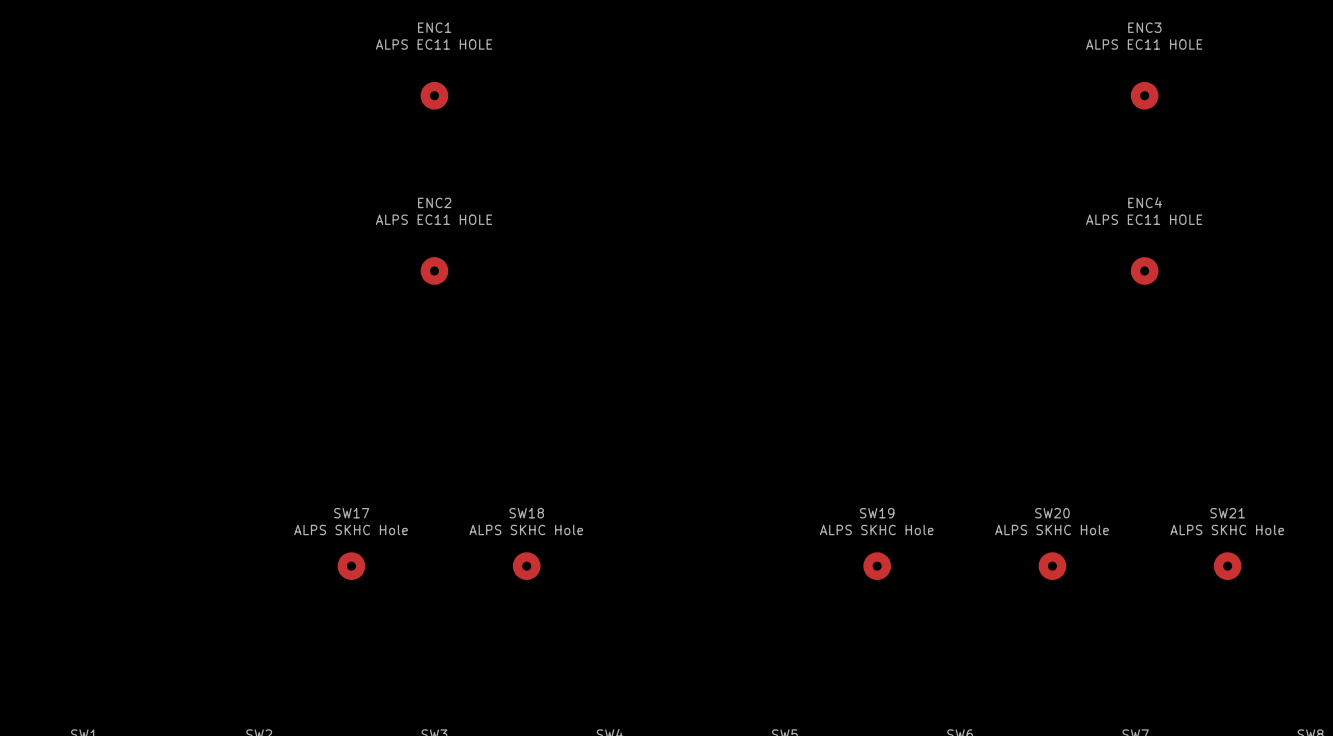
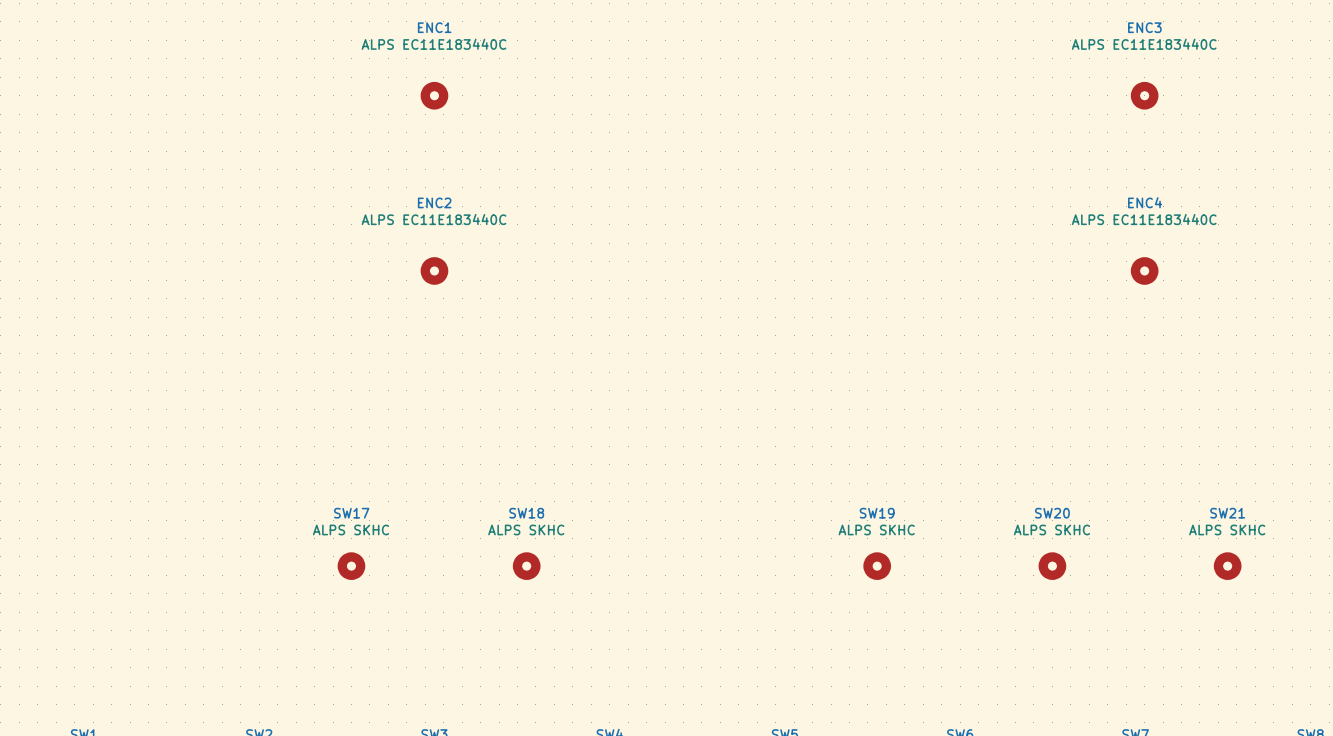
ENC1 value: ALPS EC11 HOLE (434, 44) -> ALPS EC11E183440C (434, 44)
ENC3 value: ALPS EC11 HOLE (1144, 44) -> ALPS EC11E183440C (1144, 44)
ENC2 value: ALPS EC11 HOLE (434, 219) -> ALPS EC11E183440C (434, 219)
ENC4 value: ALPS EC11 HOLE (1144, 219) -> ALPS EC11E183440C (1144, 219)
SW17 value: ALPS SKHC Hole (351, 529) -> ALPS SKHC (351, 529)
SW18 value: ALPS SKHC Hole (526, 529) -> ALPS SKHC (526, 529)
SW19 value: ALPS SKHC Hole (876, 529) -> ALPS SKHC (876, 529)
SW20 value: ALPS SKHC Hole (1051, 529) -> ALPS SKHC (1051, 529)
SW21 value: ALPS SKHC Hole (1227, 529) -> ALPS SKHC (1227, 529)

